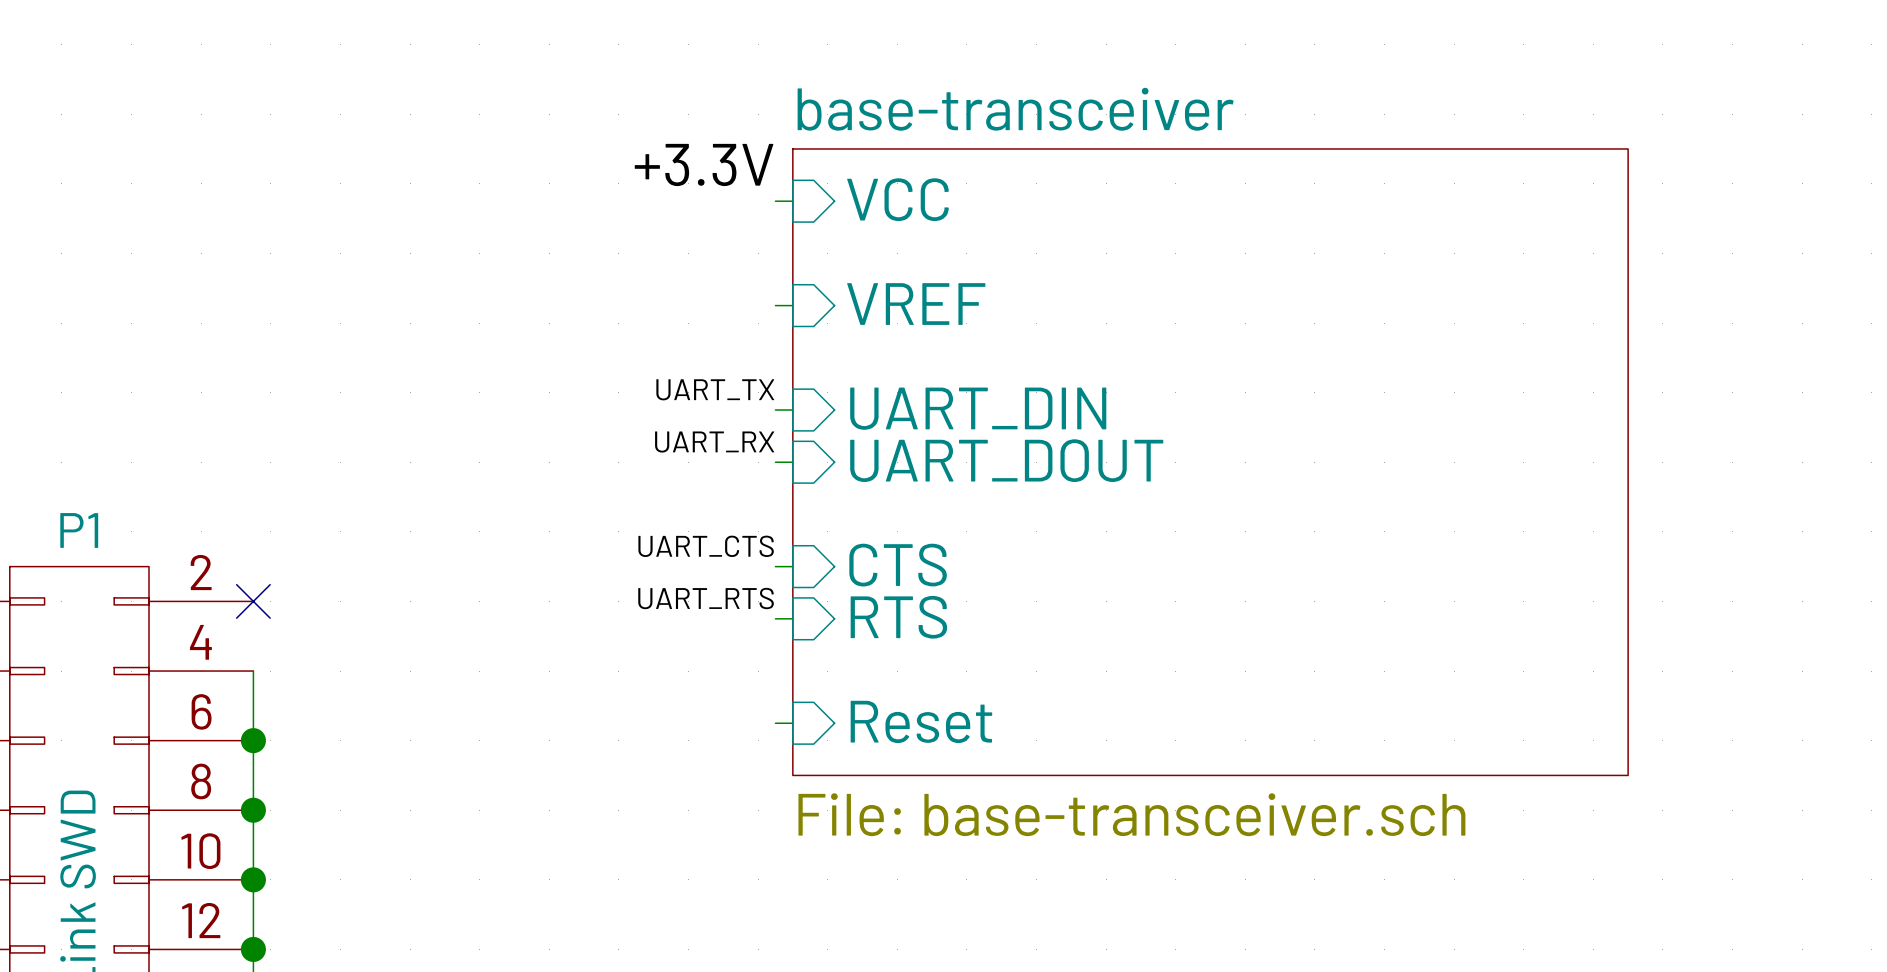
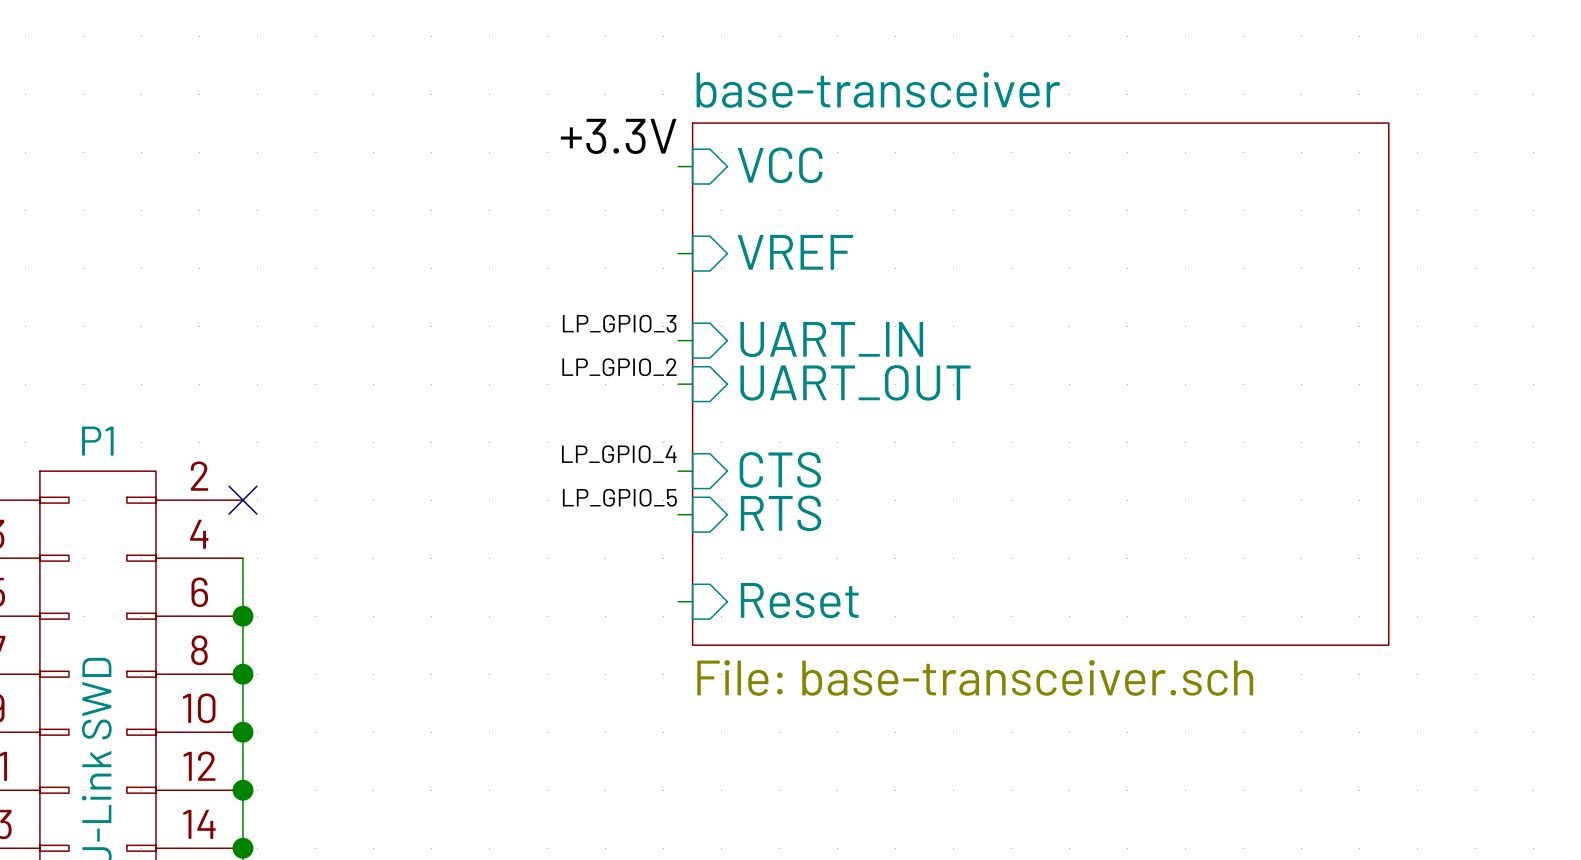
label: UART_TX (715, 389) -> LP_GPIO_3 (619, 323)
sheet pin: UART_DIN (978, 408) -> UART_IN (831, 339)
label: UART_RX (714, 442) -> LP_GPIO_2 (619, 367)
sheet pin: UART_DOUT (1006, 460) -> UART_OUT (855, 382)
label: UART_CTS (706, 546) -> LP_GPIO_4 (619, 454)
label: UART_RTS (706, 598) -> LP_GPIO_5 (619, 497)

